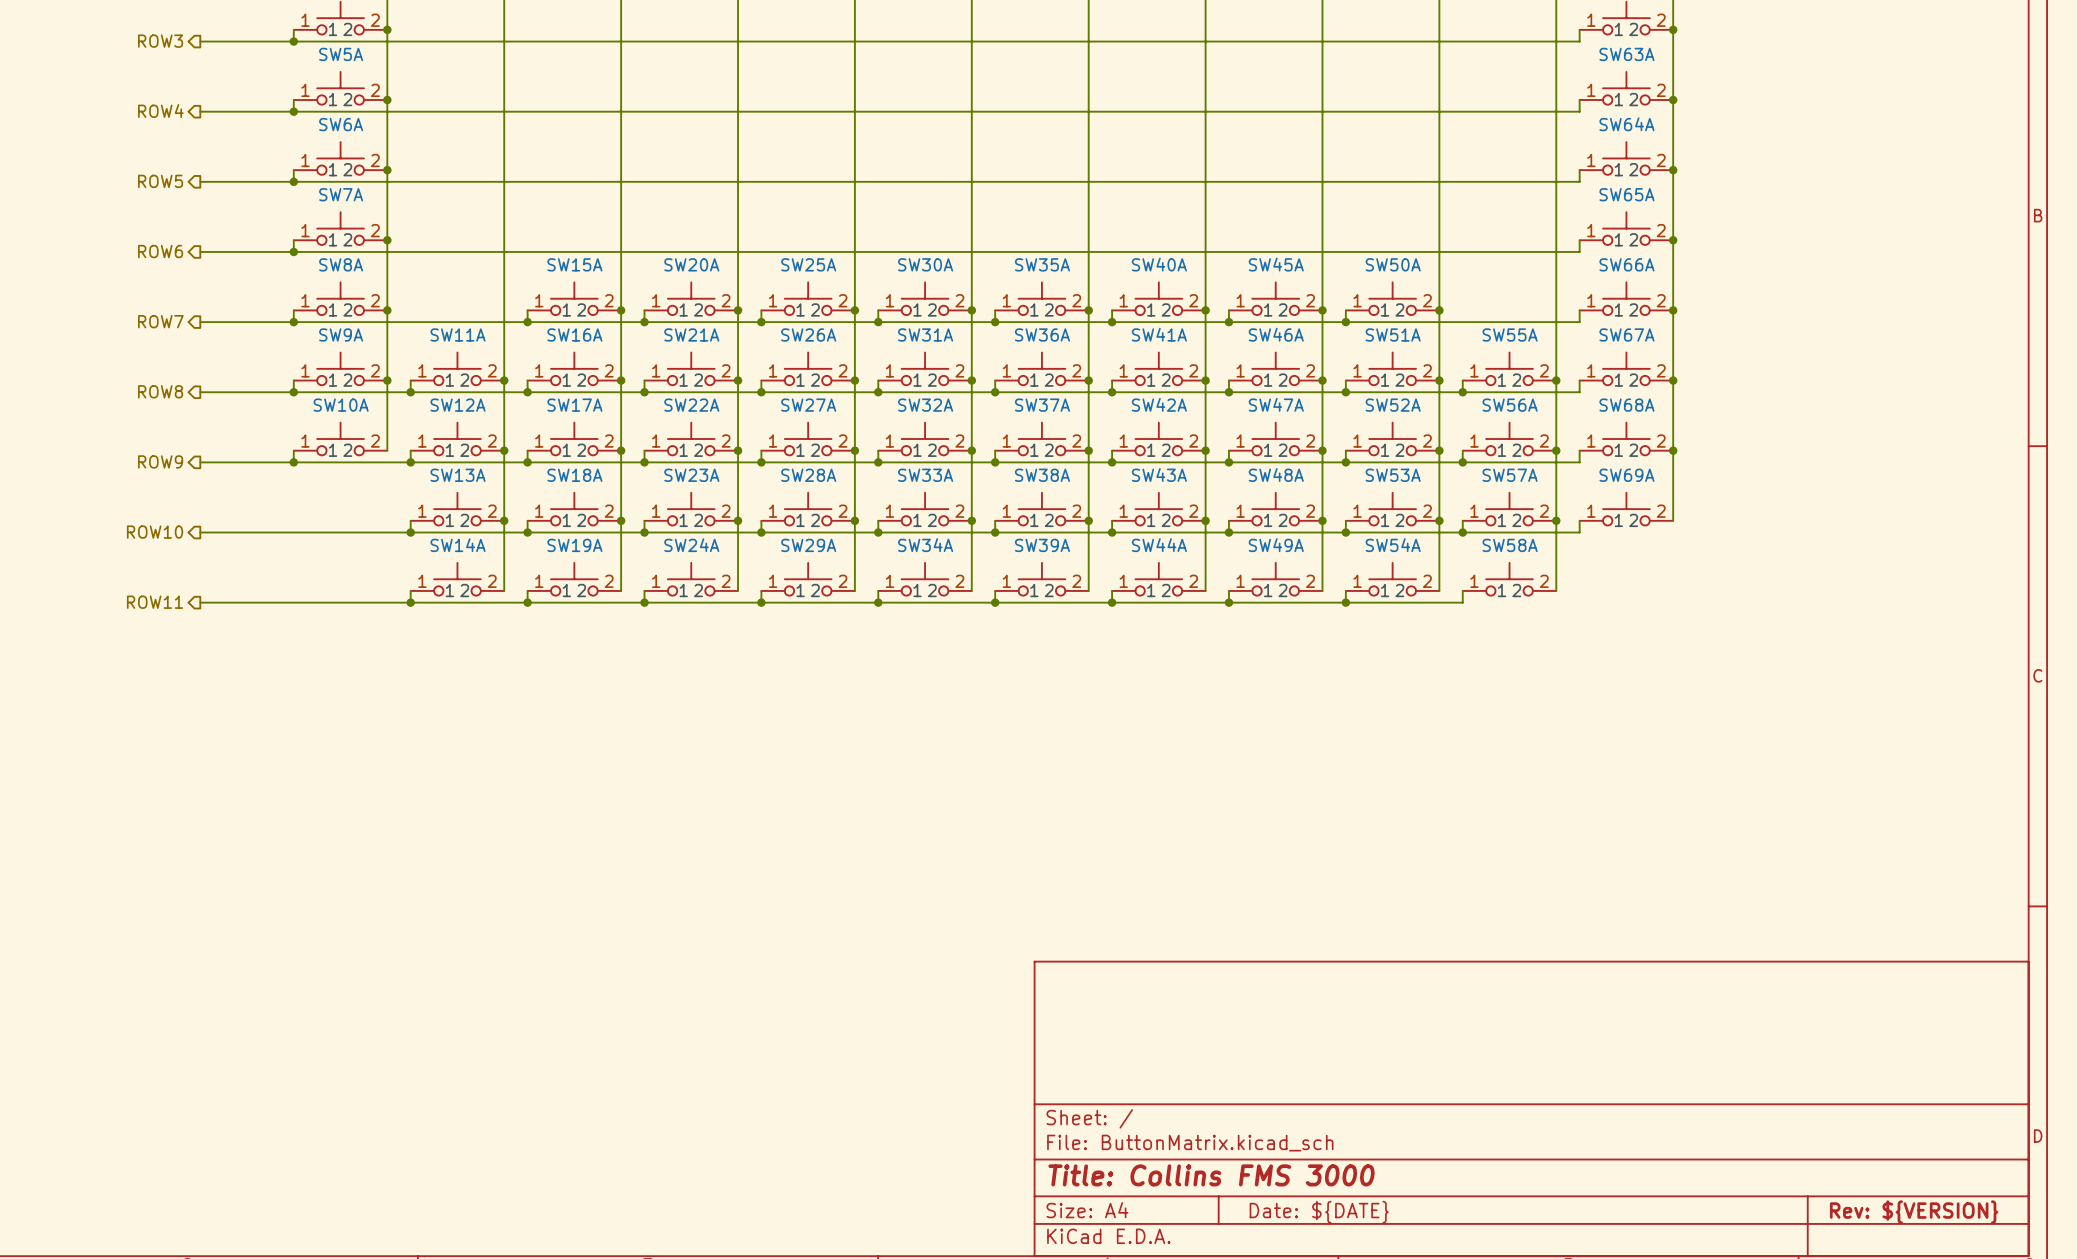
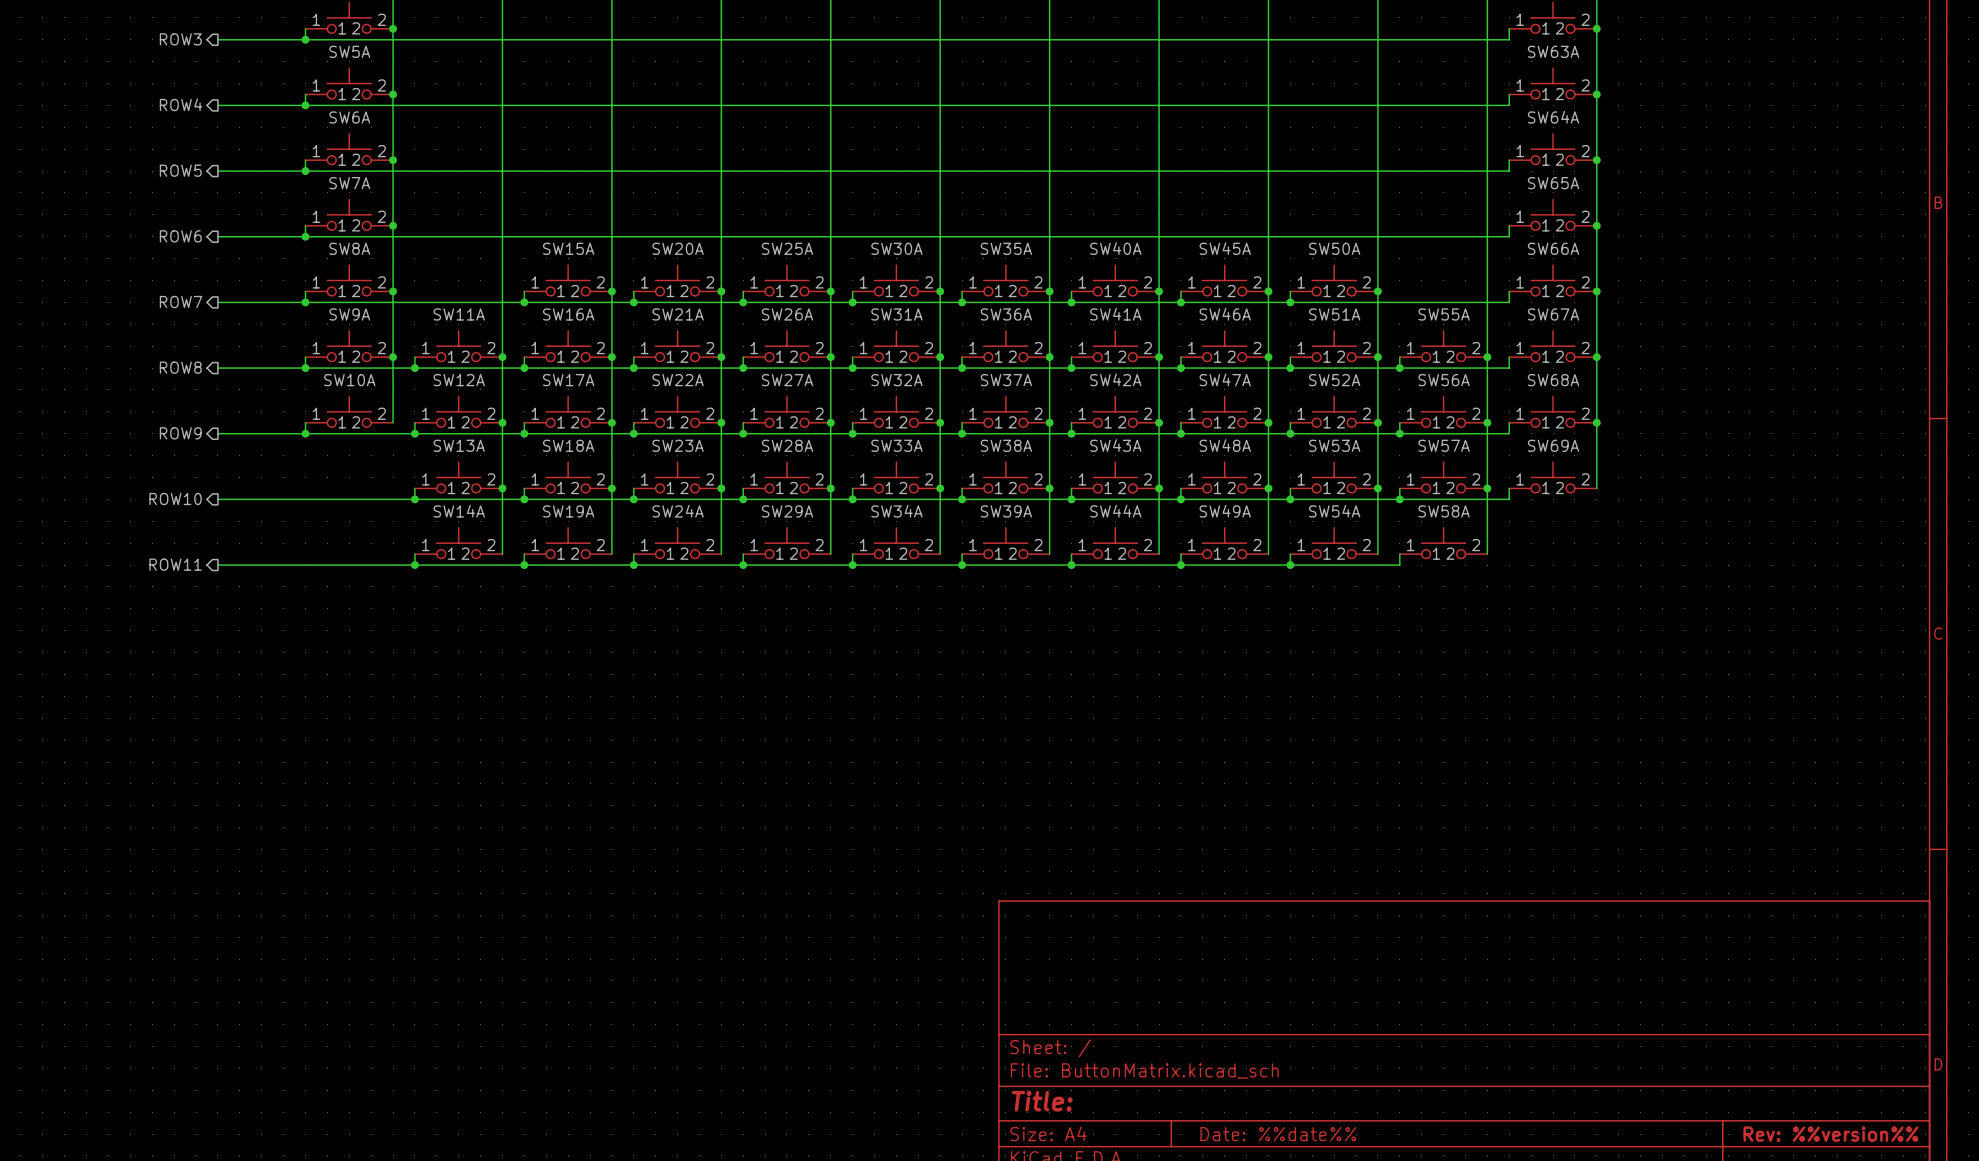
title block: Title: Collins FMS 3000 (1211, 1175) -> Title: (1042, 1101)
title block: Date: ${DATE} (1319, 1212) -> Date: %%date%% (1278, 1134)
title block: Rev: ${VERSION} (1914, 1212) -> Rev: %%version%% (1830, 1134)

